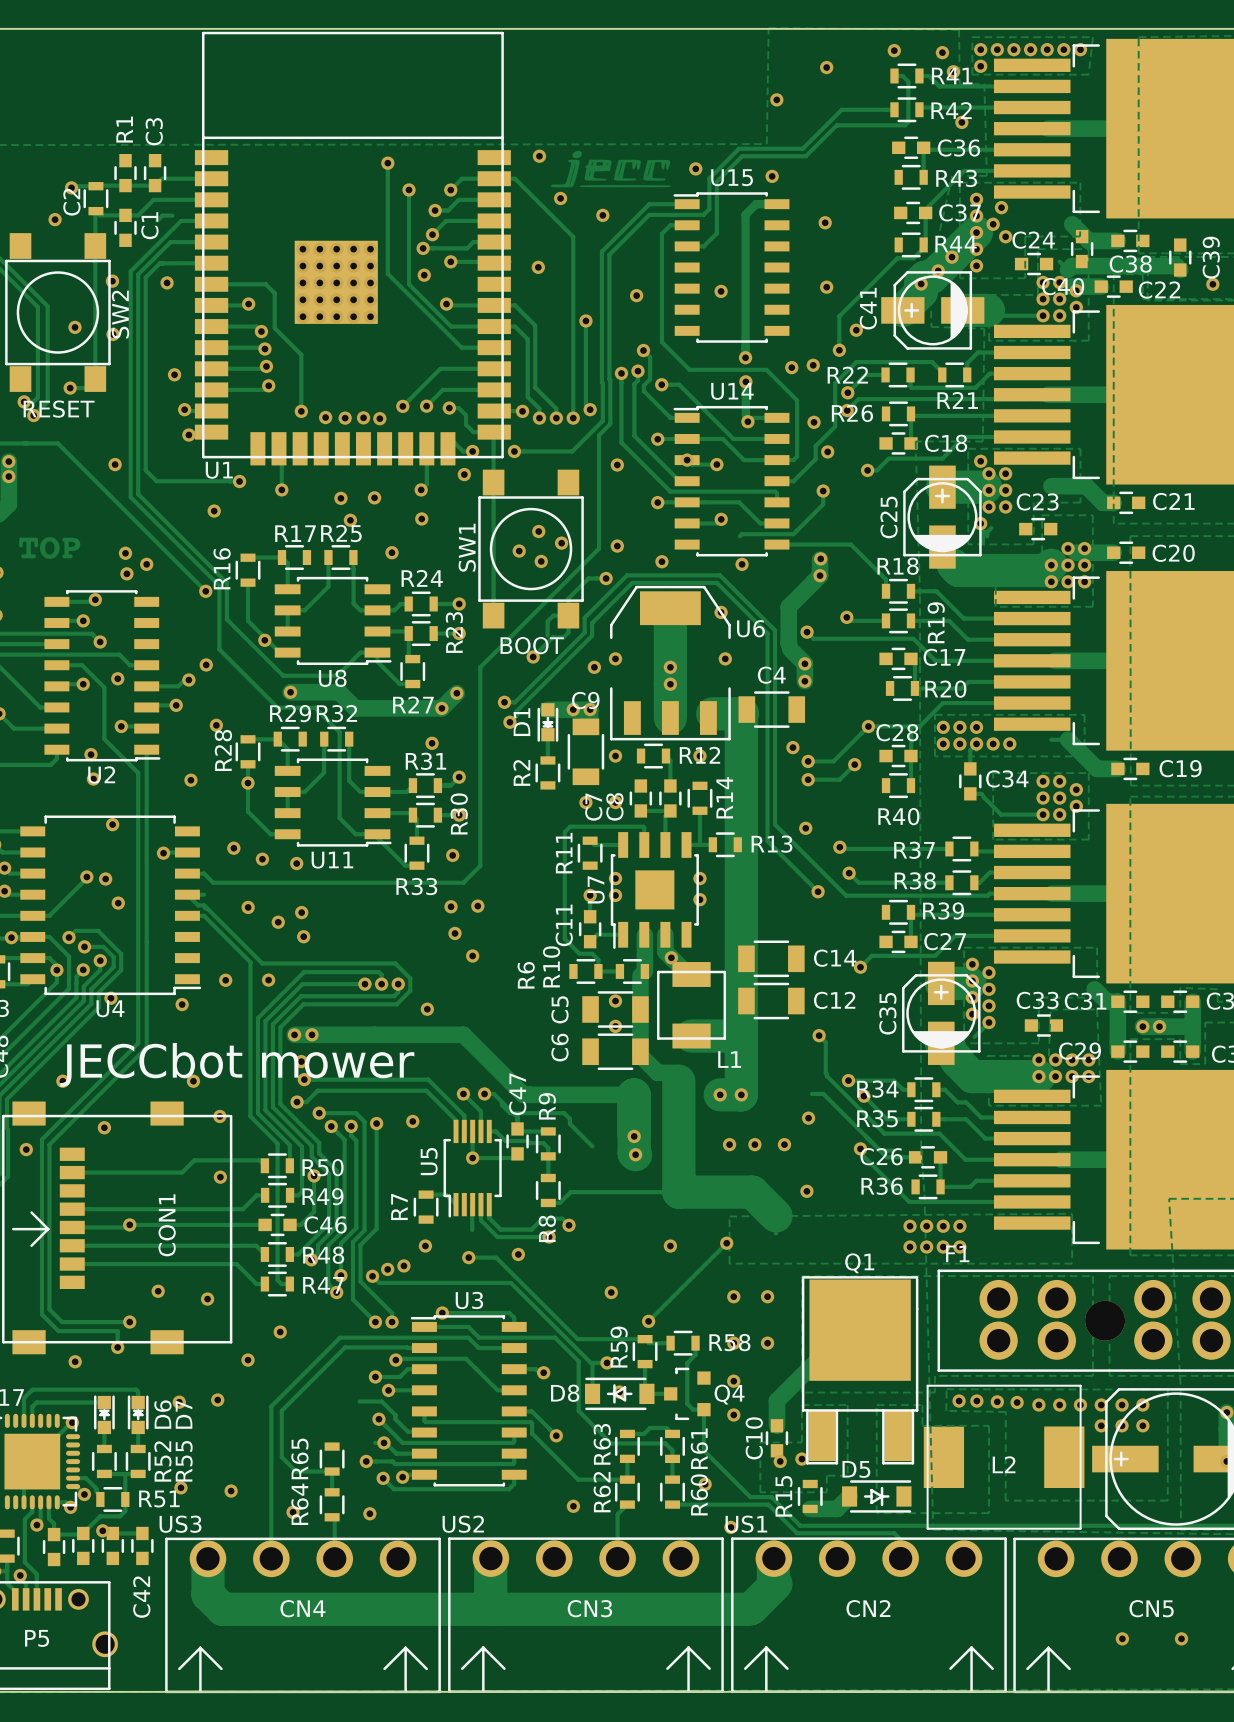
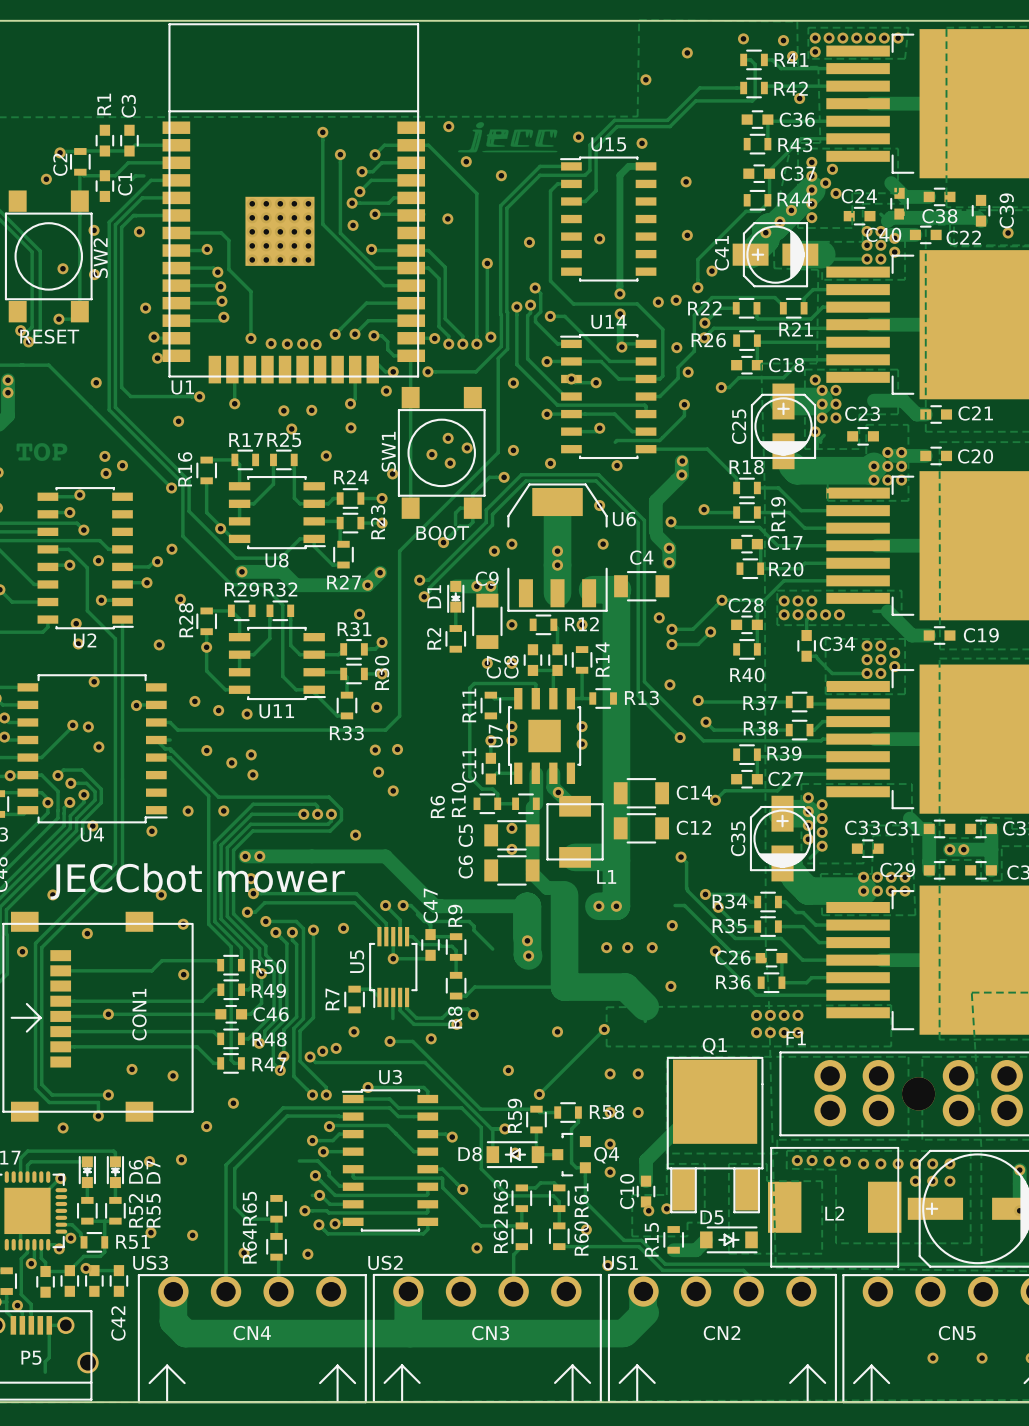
via: none -> (392, 473)
track: none -> (65, 1325) (49, 1325) (49, 1357) (45, 1361) (45, 1372)

